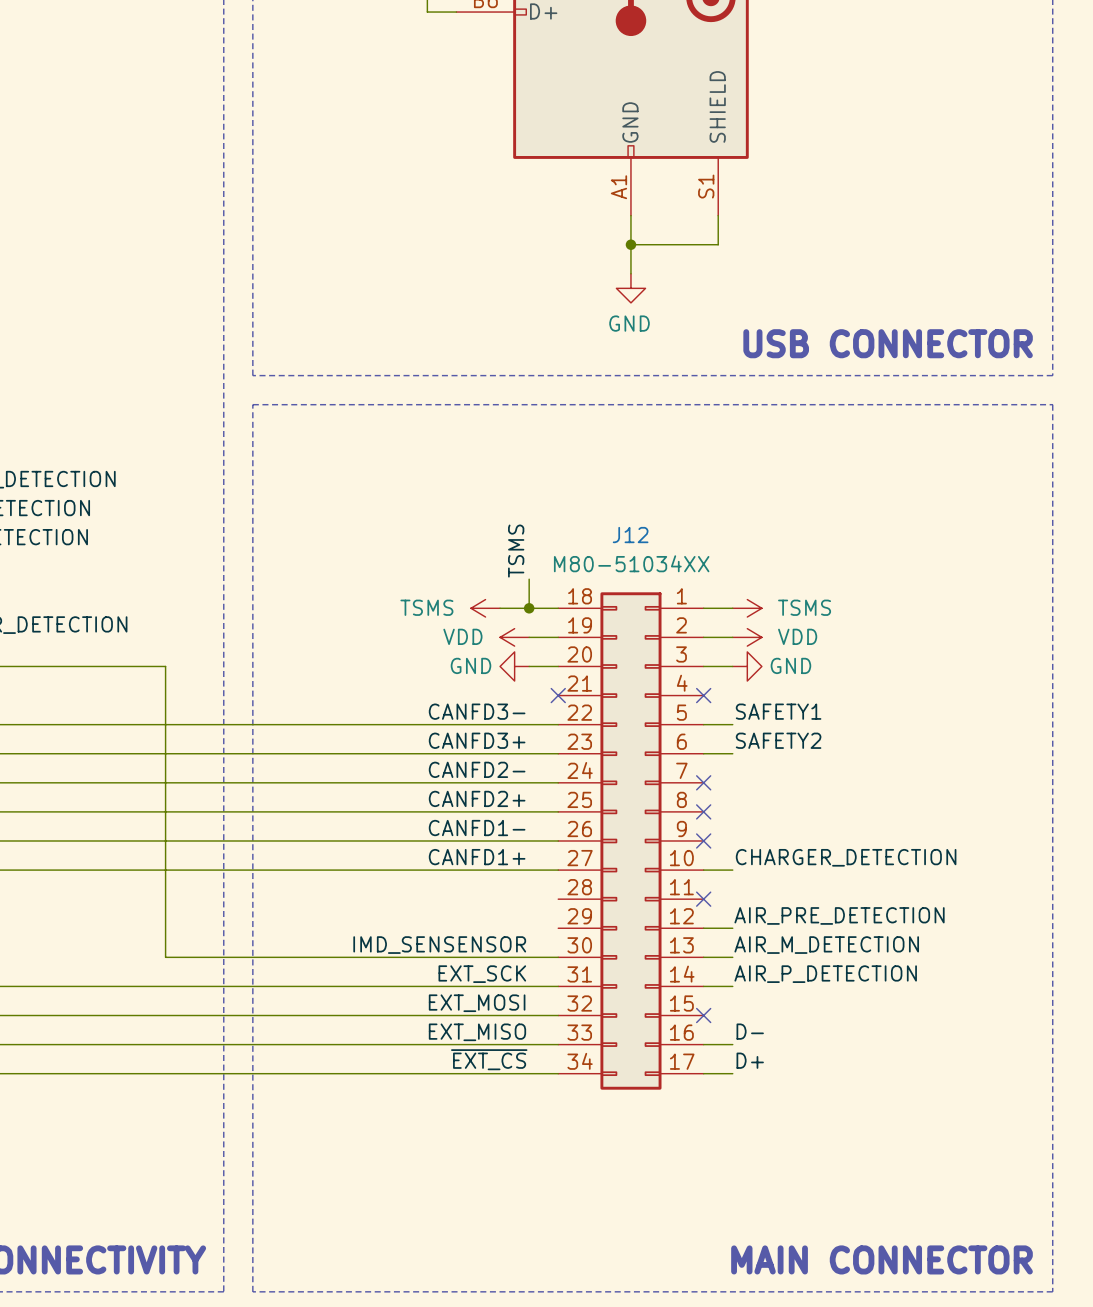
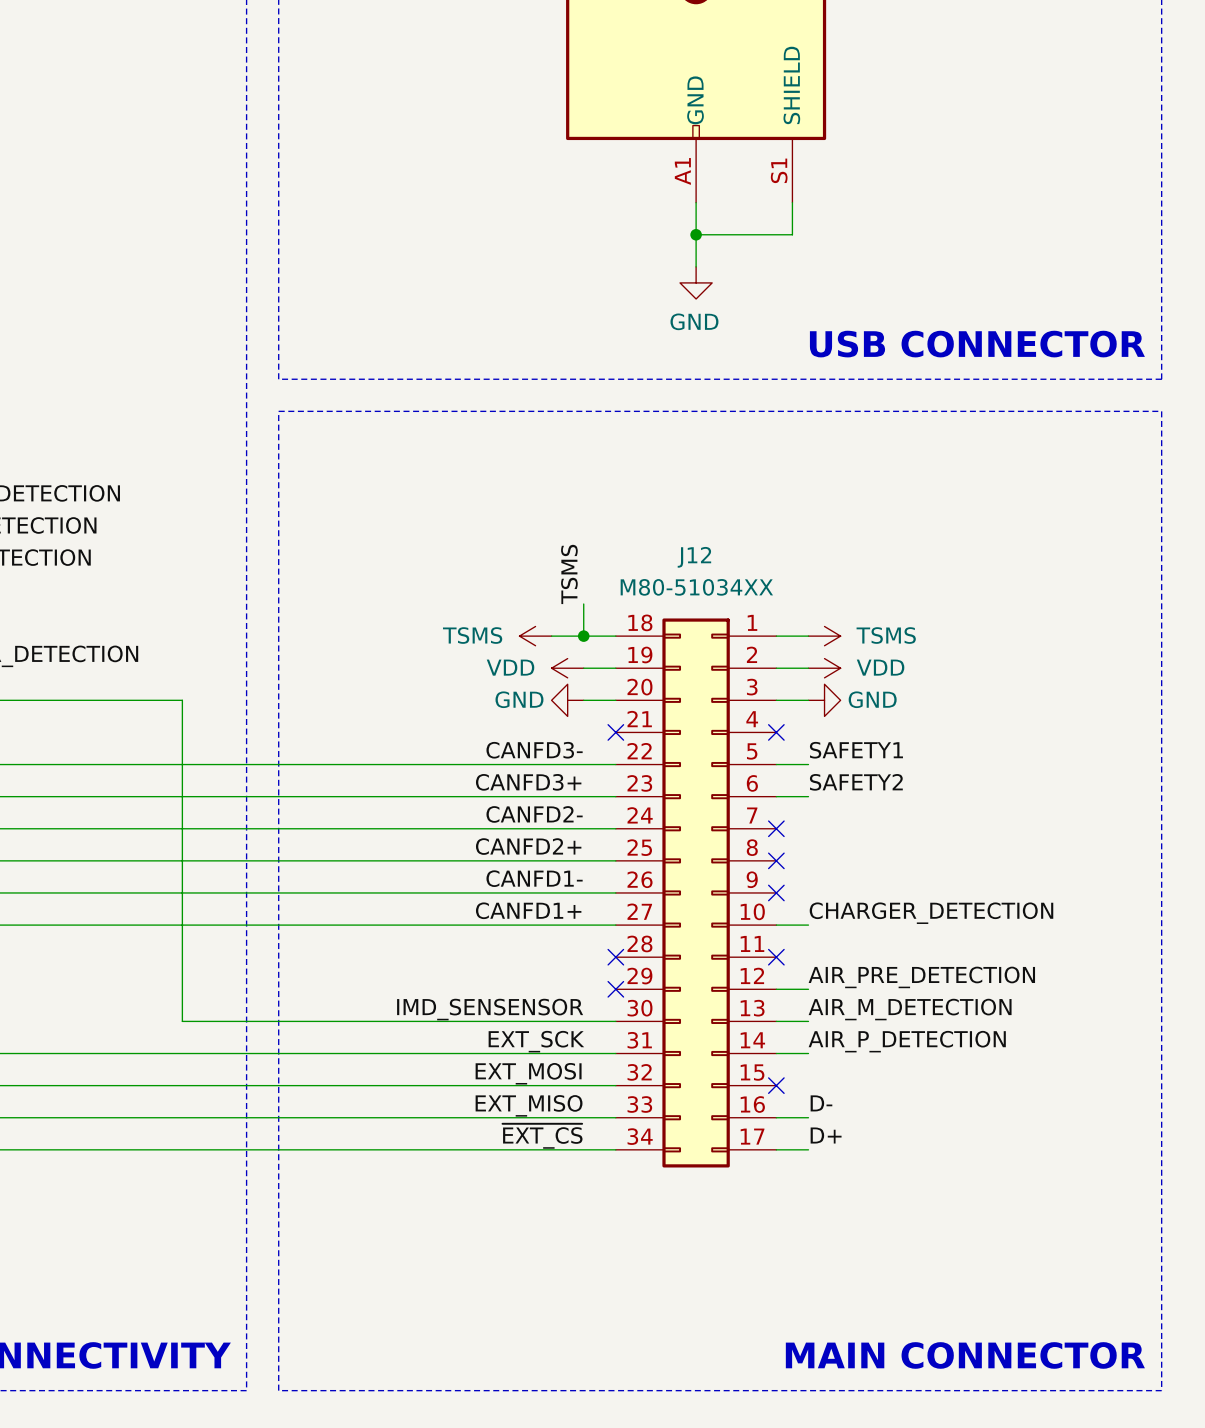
no-connect mark: none -> (615, 957)
no-connect mark: none -> (615, 989)

